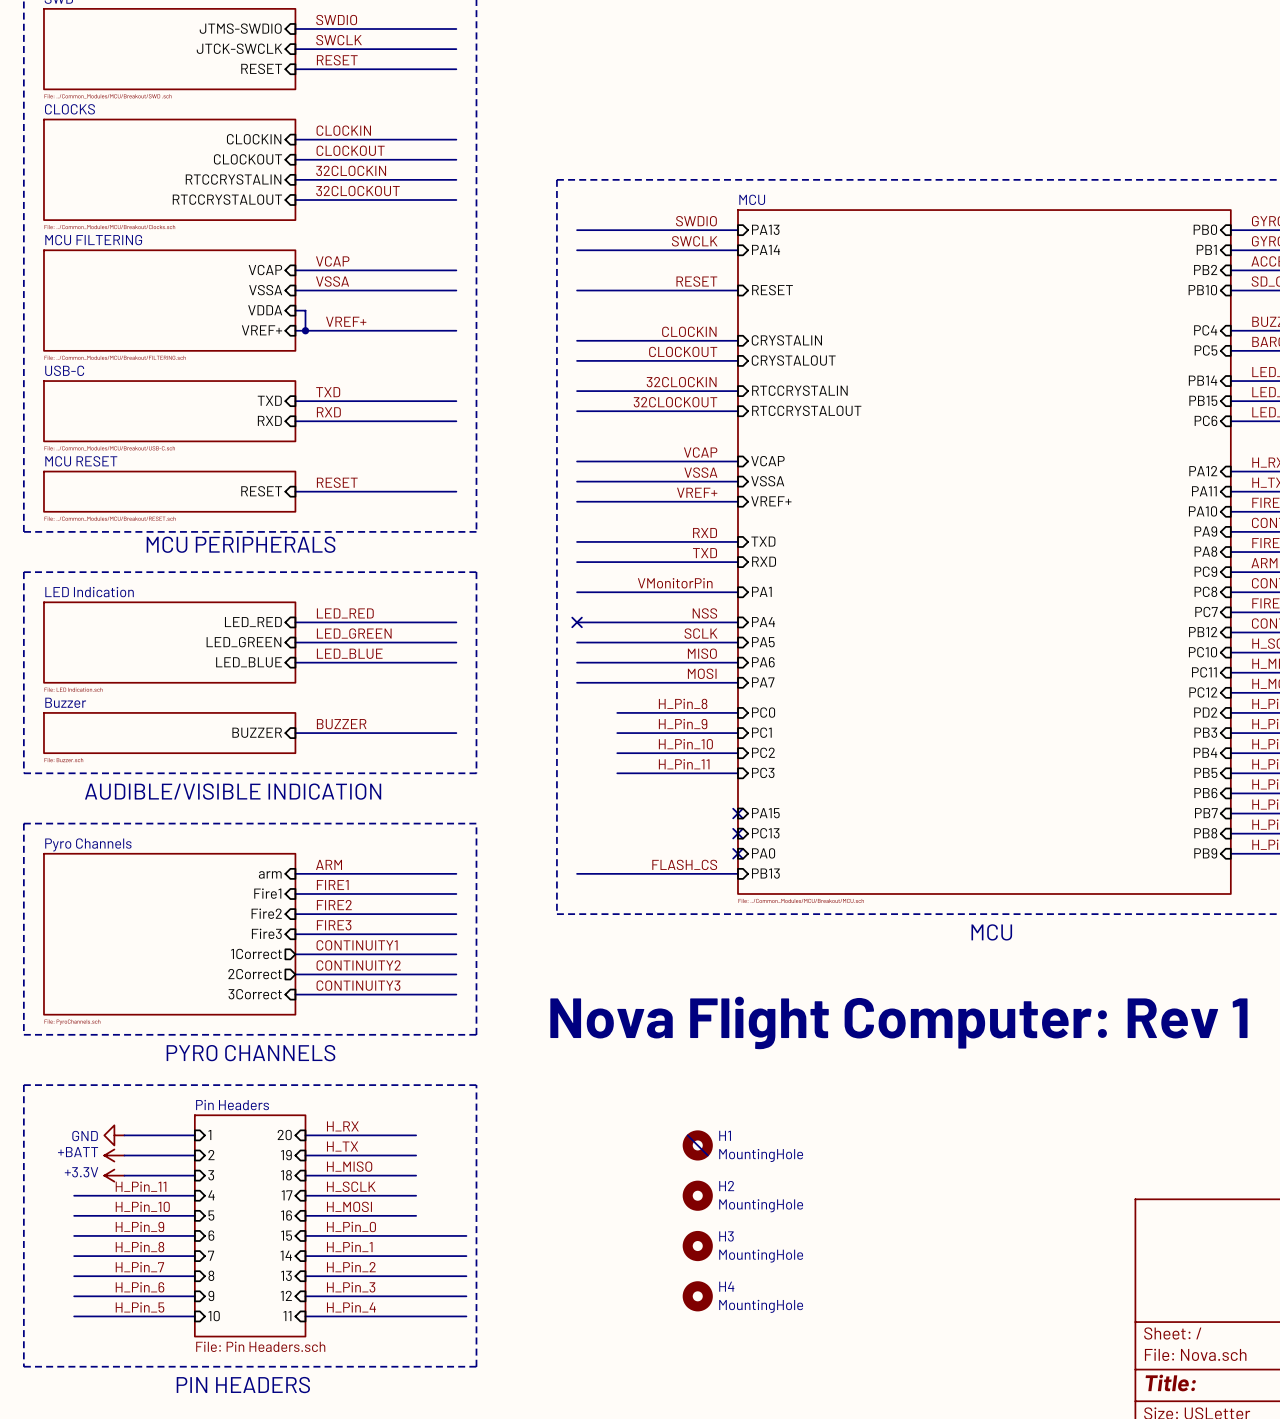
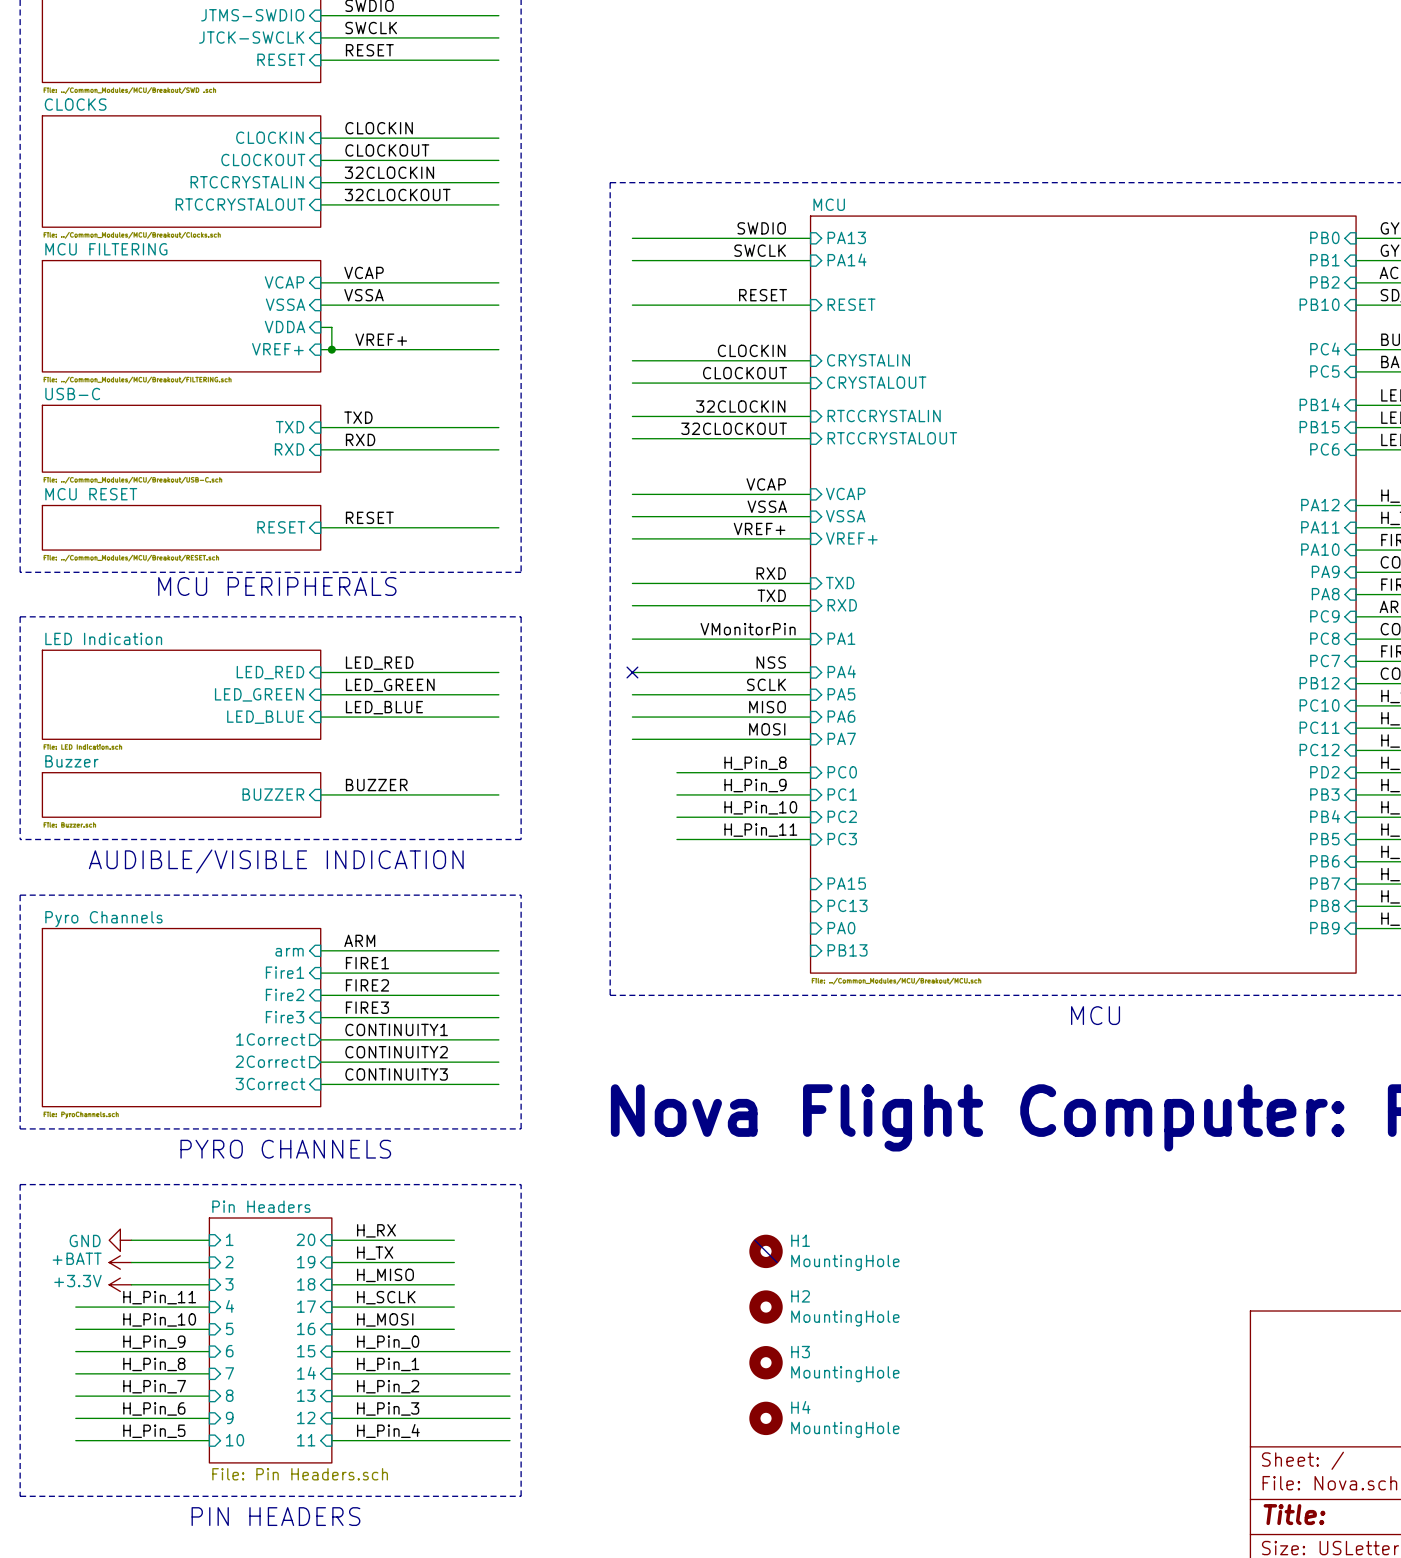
no-connect mark: (737, 813) -> none
no-connect mark: (737, 833) -> none
no-connect mark: (737, 853) -> none
label: FLASH_CS (684, 864) -> none
wire: (577, 873) (737, 873) -> none

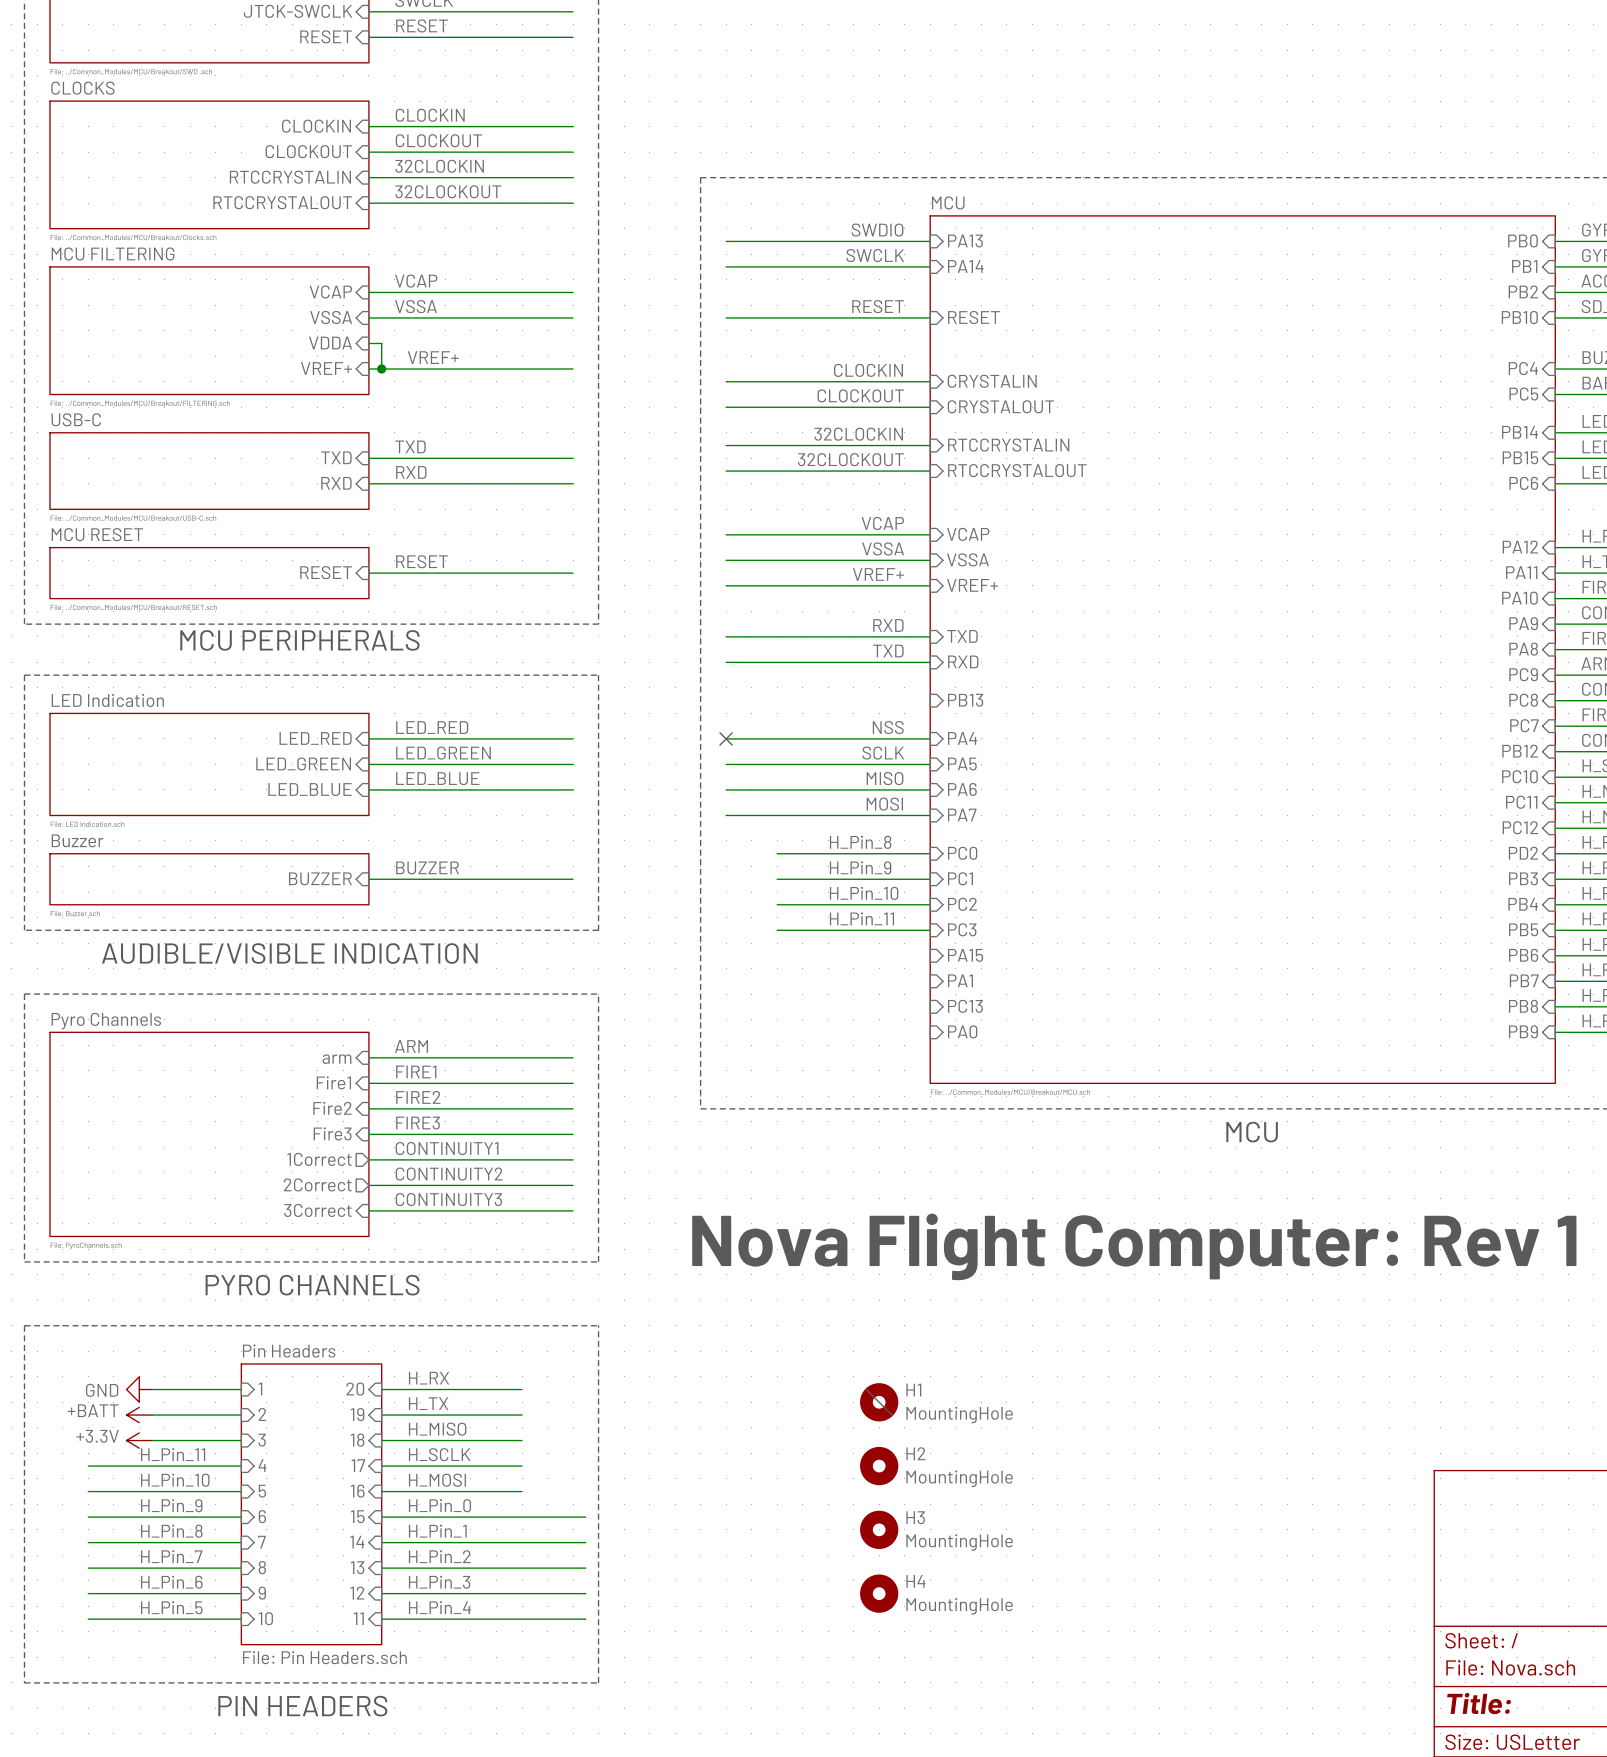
label: VMonitorPin (748, 629) -> none
sheet pin: PA1 (841, 638) -> PB13 (965, 700)
wire: (632, 639) (810, 639) -> none
sheet pin: none -> PA15 (965, 955)
sheet pin: PA15 (846, 883) -> PA1 (960, 980)
sheet pin: PB13 (847, 950) -> none

